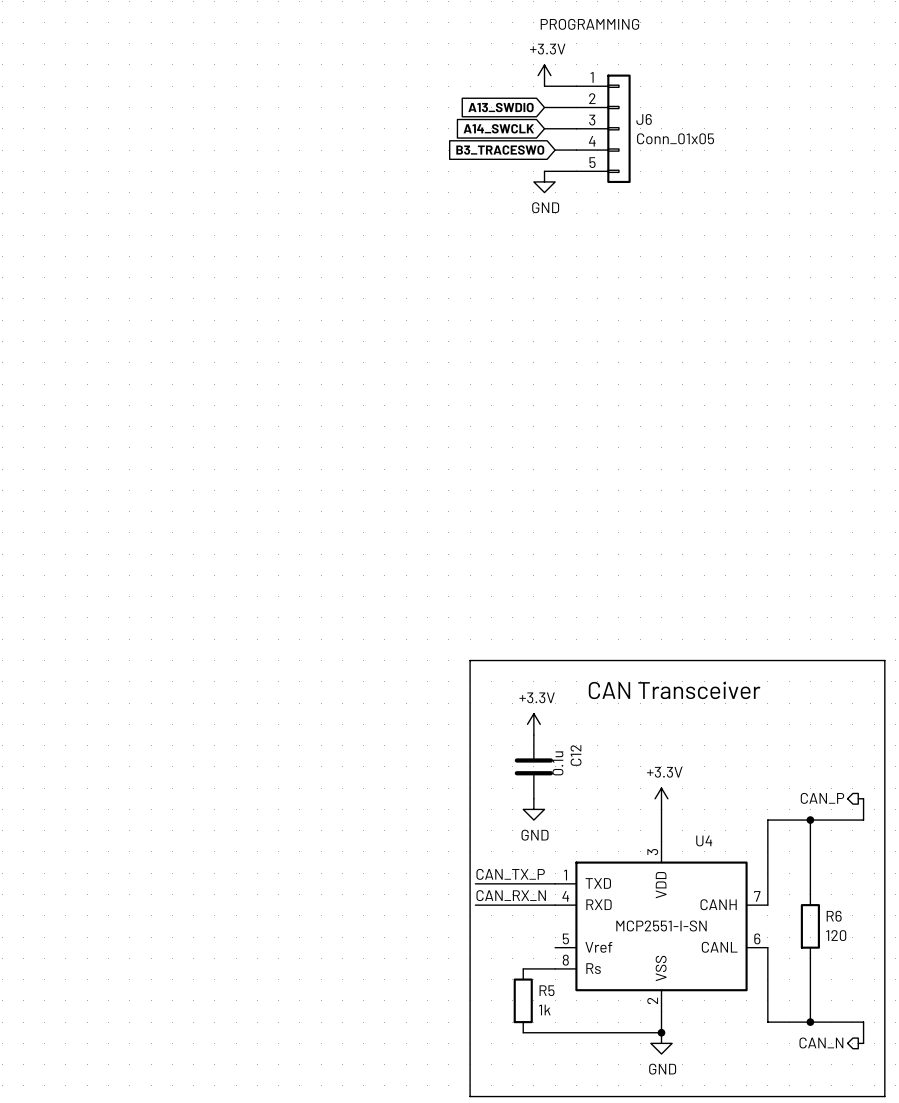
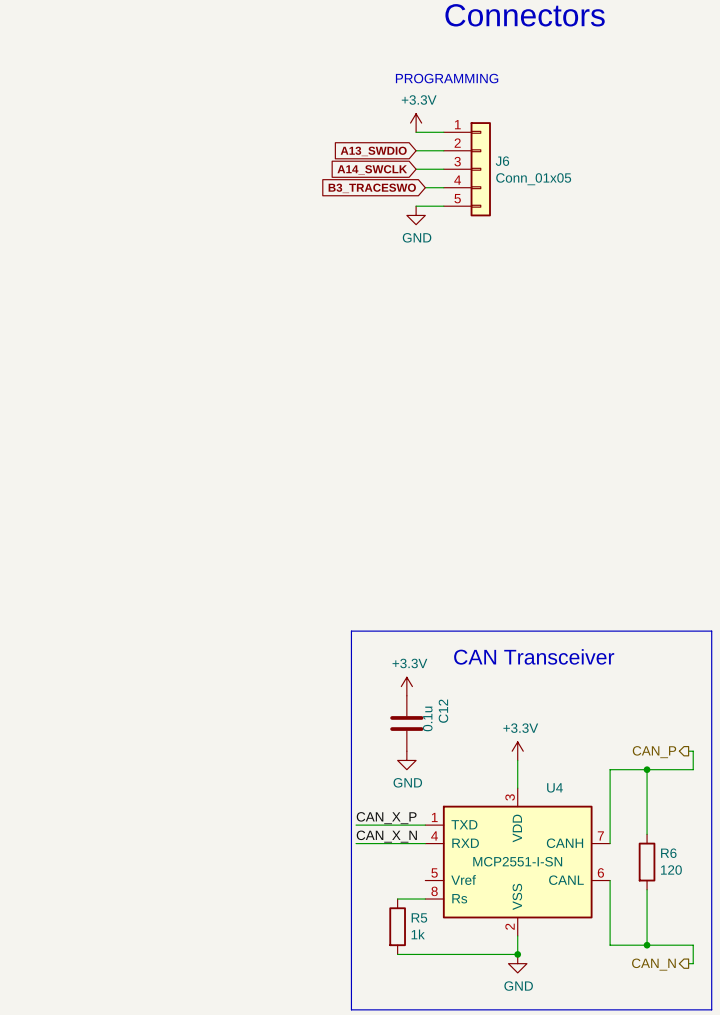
label: CAN_TX_P (510, 874) -> CAN_X_P (386, 818)
label: CAN_RX_N (511, 895) -> CAN_X_N (386, 836)

